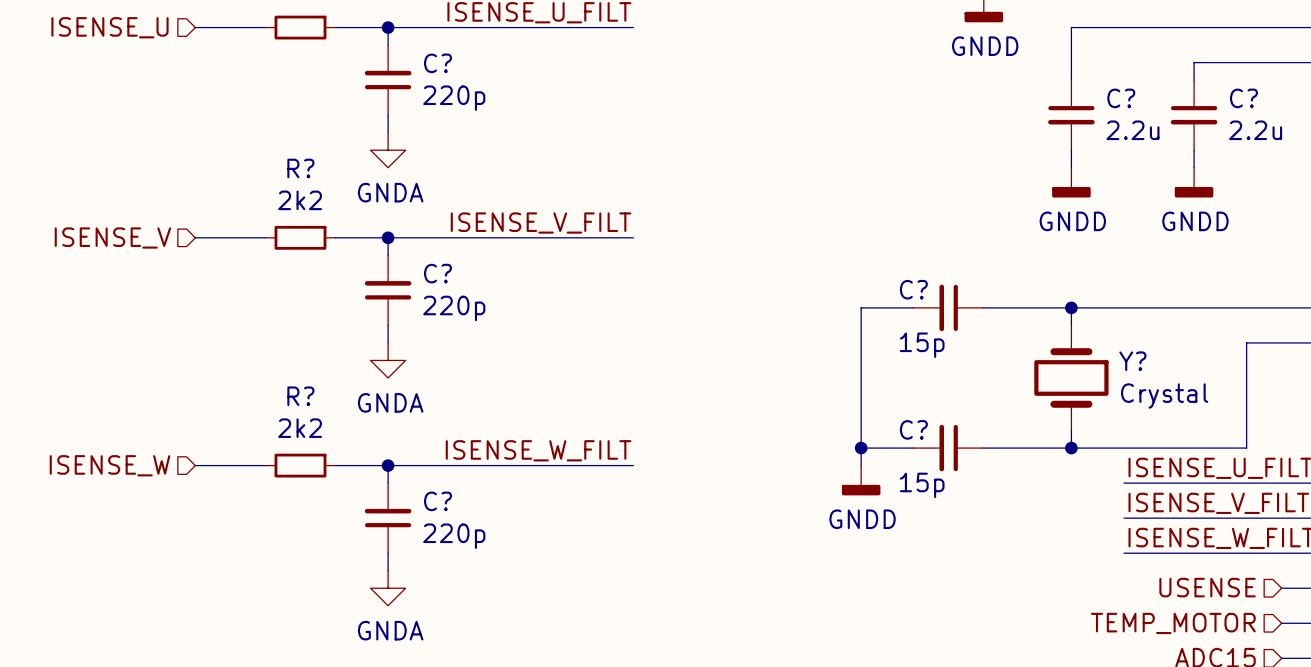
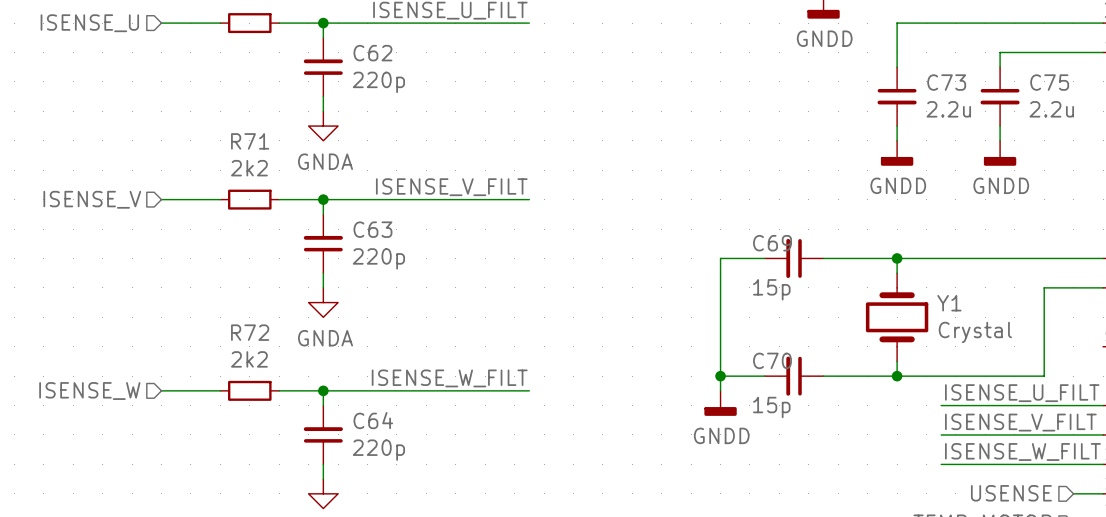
C? name: C? (437, 63) -> C62 (372, 53)
C? name: C? (1121, 98) -> C73 (946, 82)
C? name: C? (1243, 98) -> C75 (1049, 82)
R? name: R? (300, 168) -> R71 (250, 141)
C? name: C? (437, 273) -> C63 (372, 229)
C? name: C? (913, 289) -> C69 (772, 243)
Y? name: Y? (1132, 361) -> Y1 (949, 303)
R? name: R? (300, 396) -> R72 (250, 332)
C? name: C? (913, 429) -> C70 (772, 360)
C? name: C? (437, 501) -> C64 (373, 420)

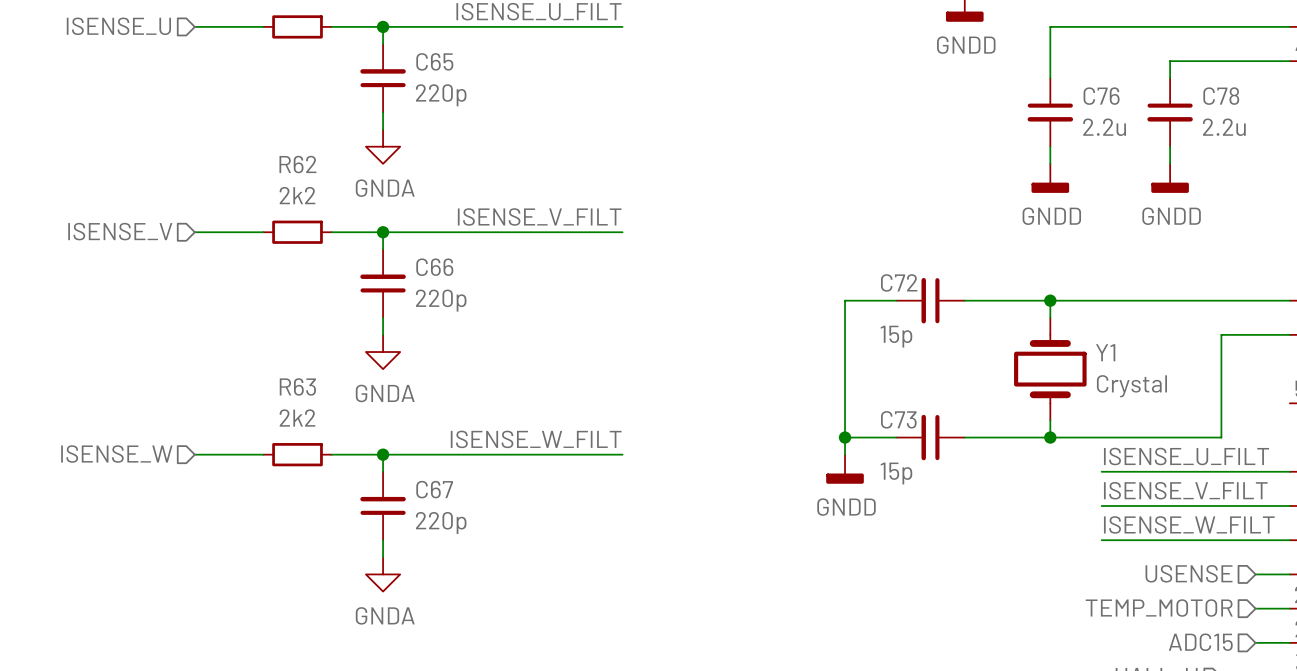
C62 name: C62 (372, 53) -> C65 (434, 61)
C73 name: C73 (946, 82) -> C76 (1101, 96)
C75 name: C75 (1049, 82) -> C78 (1221, 96)
R71 name: R71 (250, 141) -> R62 (297, 164)
C63 name: C63 (372, 229) -> C66 (434, 267)
C69 name: C69 (772, 243) -> C72 (899, 282)
R72 name: R72 (250, 332) -> R63 (297, 386)
C70 name: C70 (772, 360) -> C73 (898, 419)
C64 name: C64 (373, 420) -> C67 (434, 489)

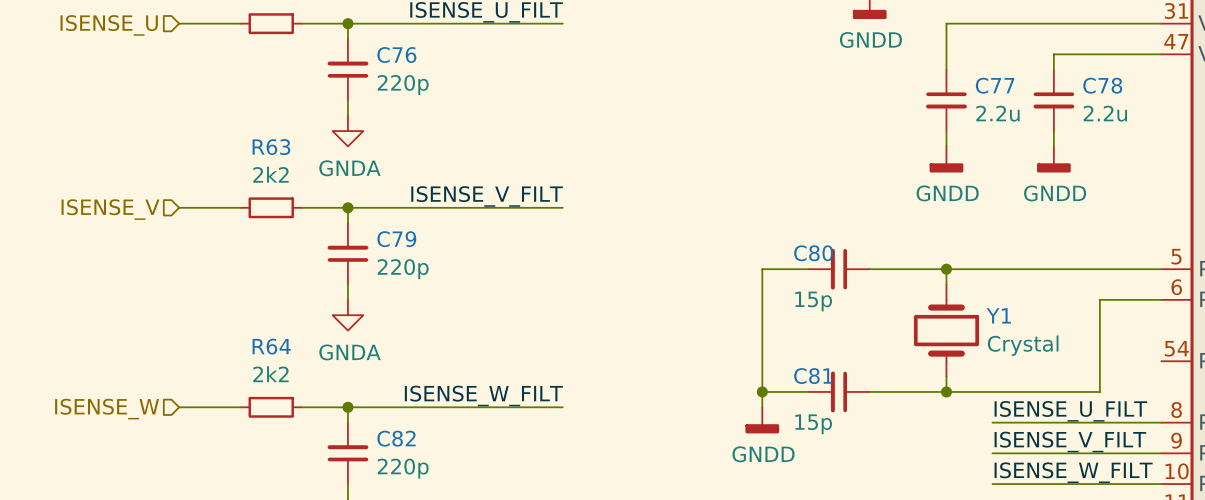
C65 name: C65 (434, 61) -> C76 (396, 55)
C76 name: C76 (1101, 96) -> C77 (995, 85)
R62 name: R62 (297, 164) -> R63 (271, 147)
C66 name: C66 (434, 267) -> C79 (396, 239)
C72 name: C72 (899, 282) -> C80 (813, 253)
R63 name: R63 (297, 386) -> R64 (271, 346)
C73 name: C73 (898, 419) -> C81 (813, 376)
C67 name: C67 (434, 489) -> C82 (396, 438)

